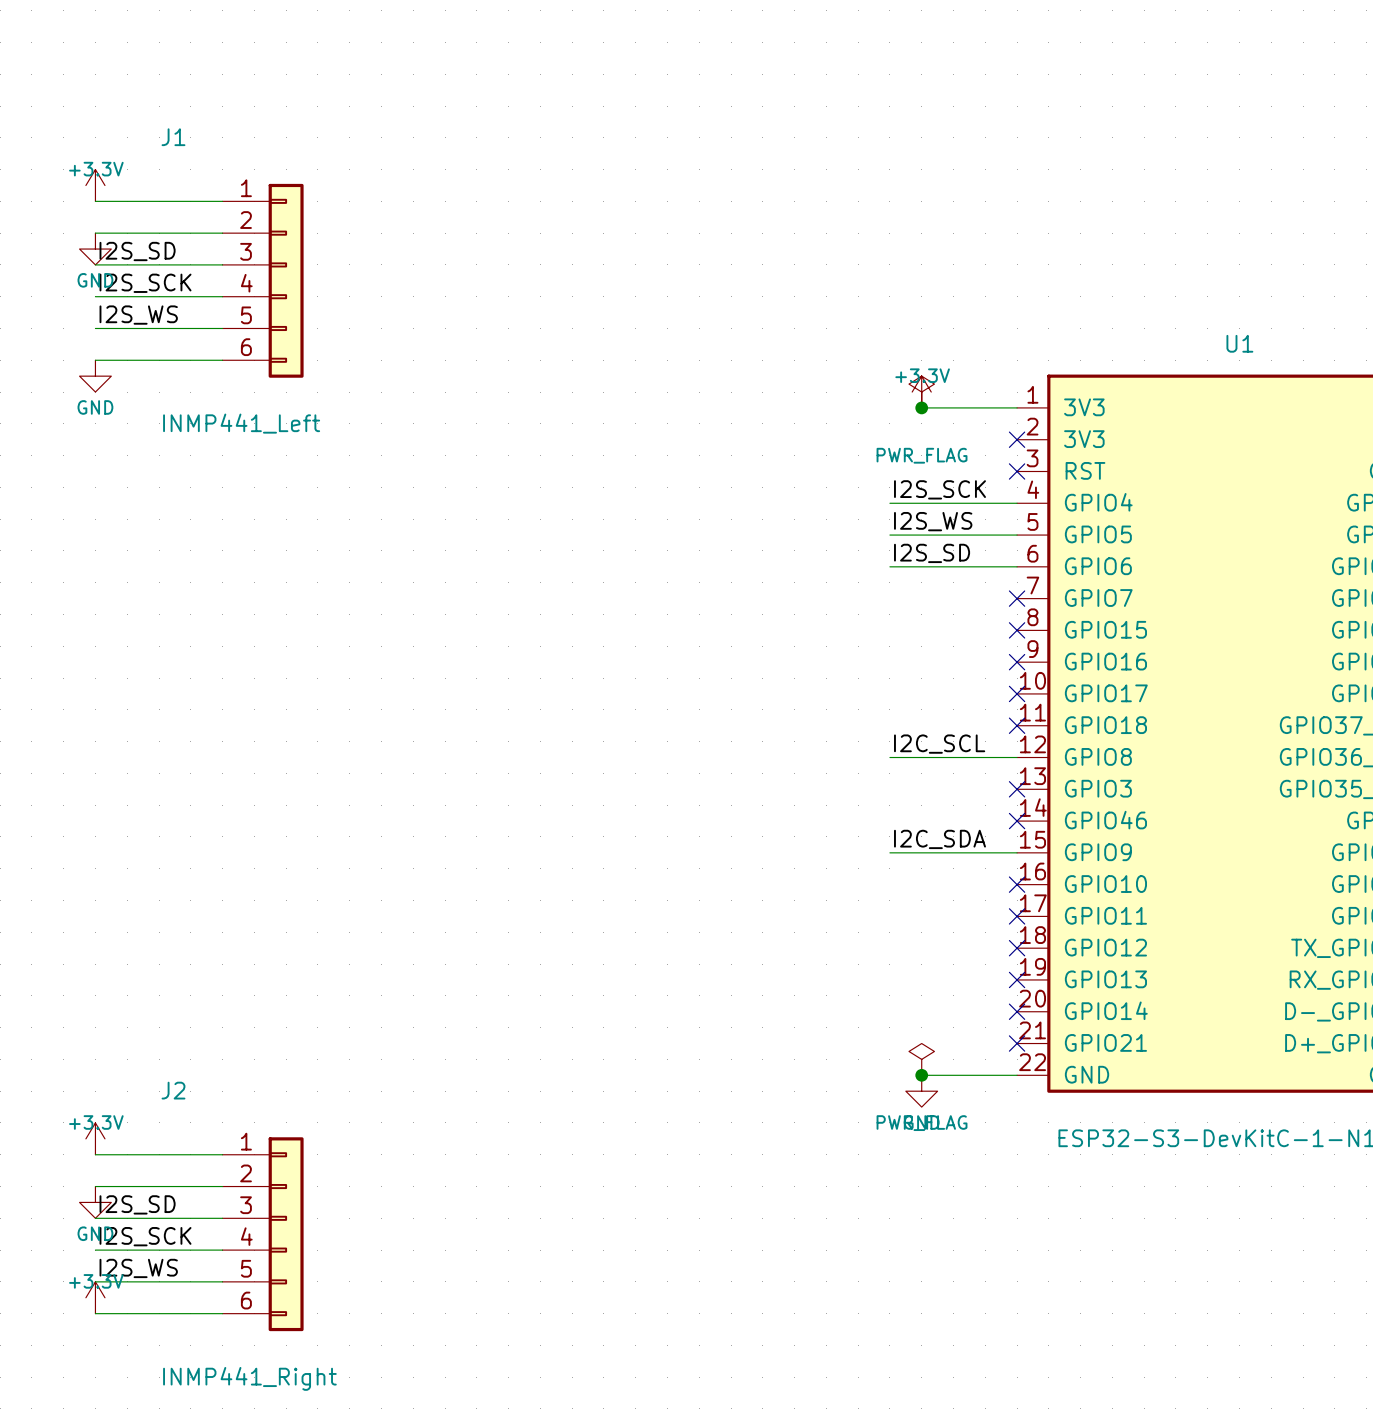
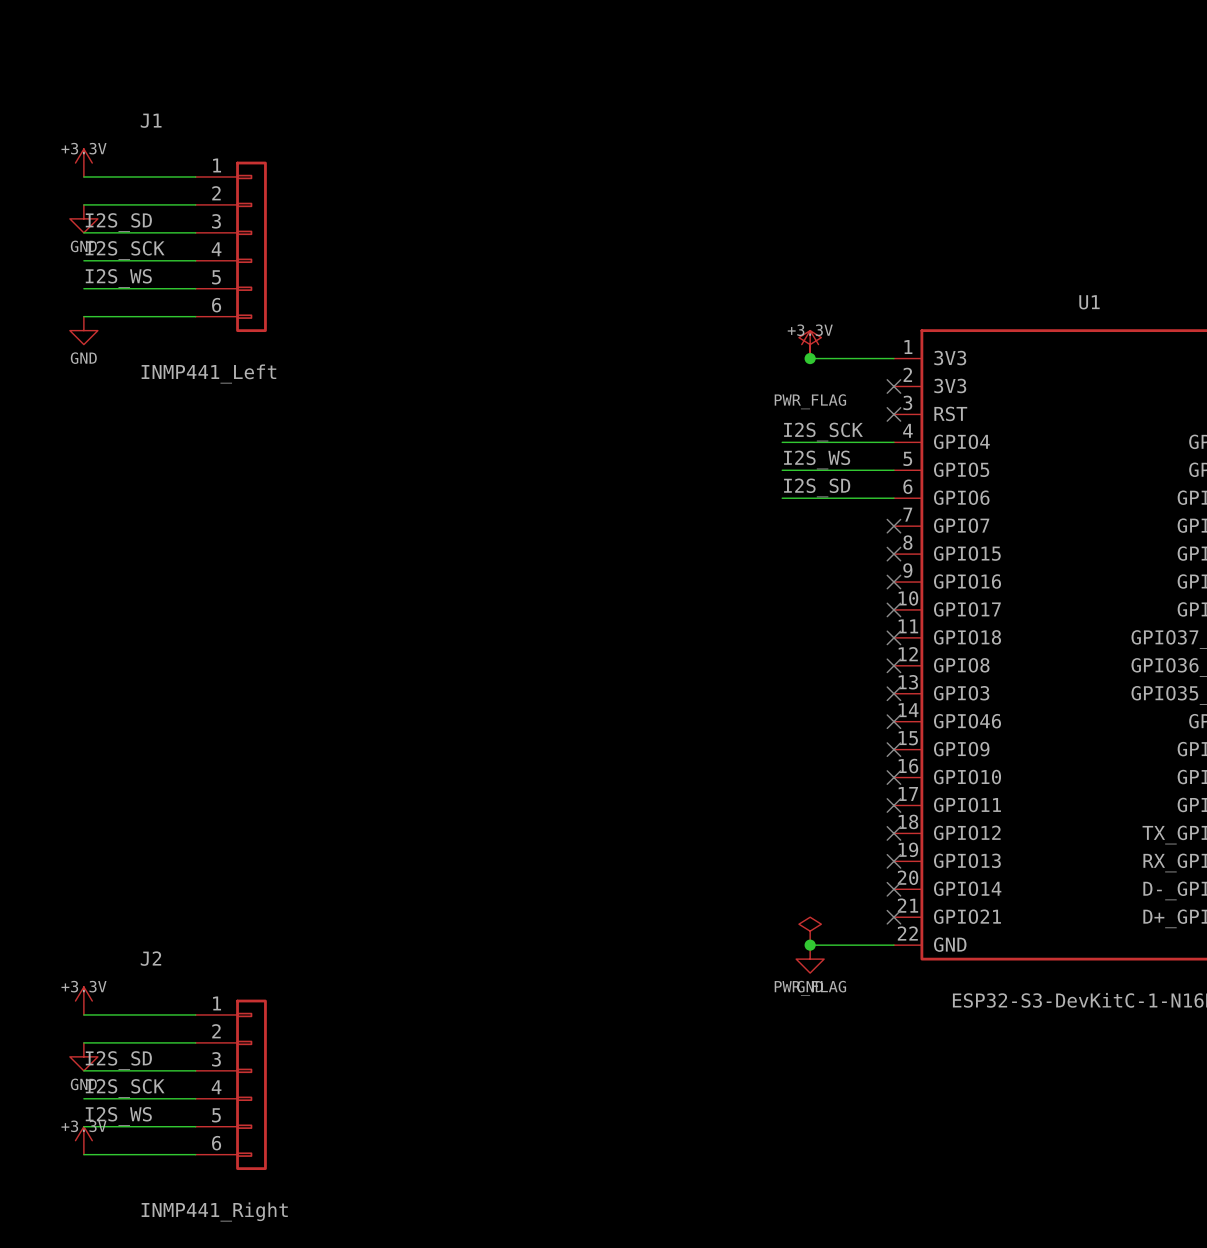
label: I2C_SCL (939, 744) -> none
wire: (889, 757) (1017, 757) -> none
no-connect mark: none -> (893, 665)
label: I2C_SDA (939, 839) -> none
wire: (889, 852) (1017, 852) -> none
no-connect mark: none -> (893, 749)

